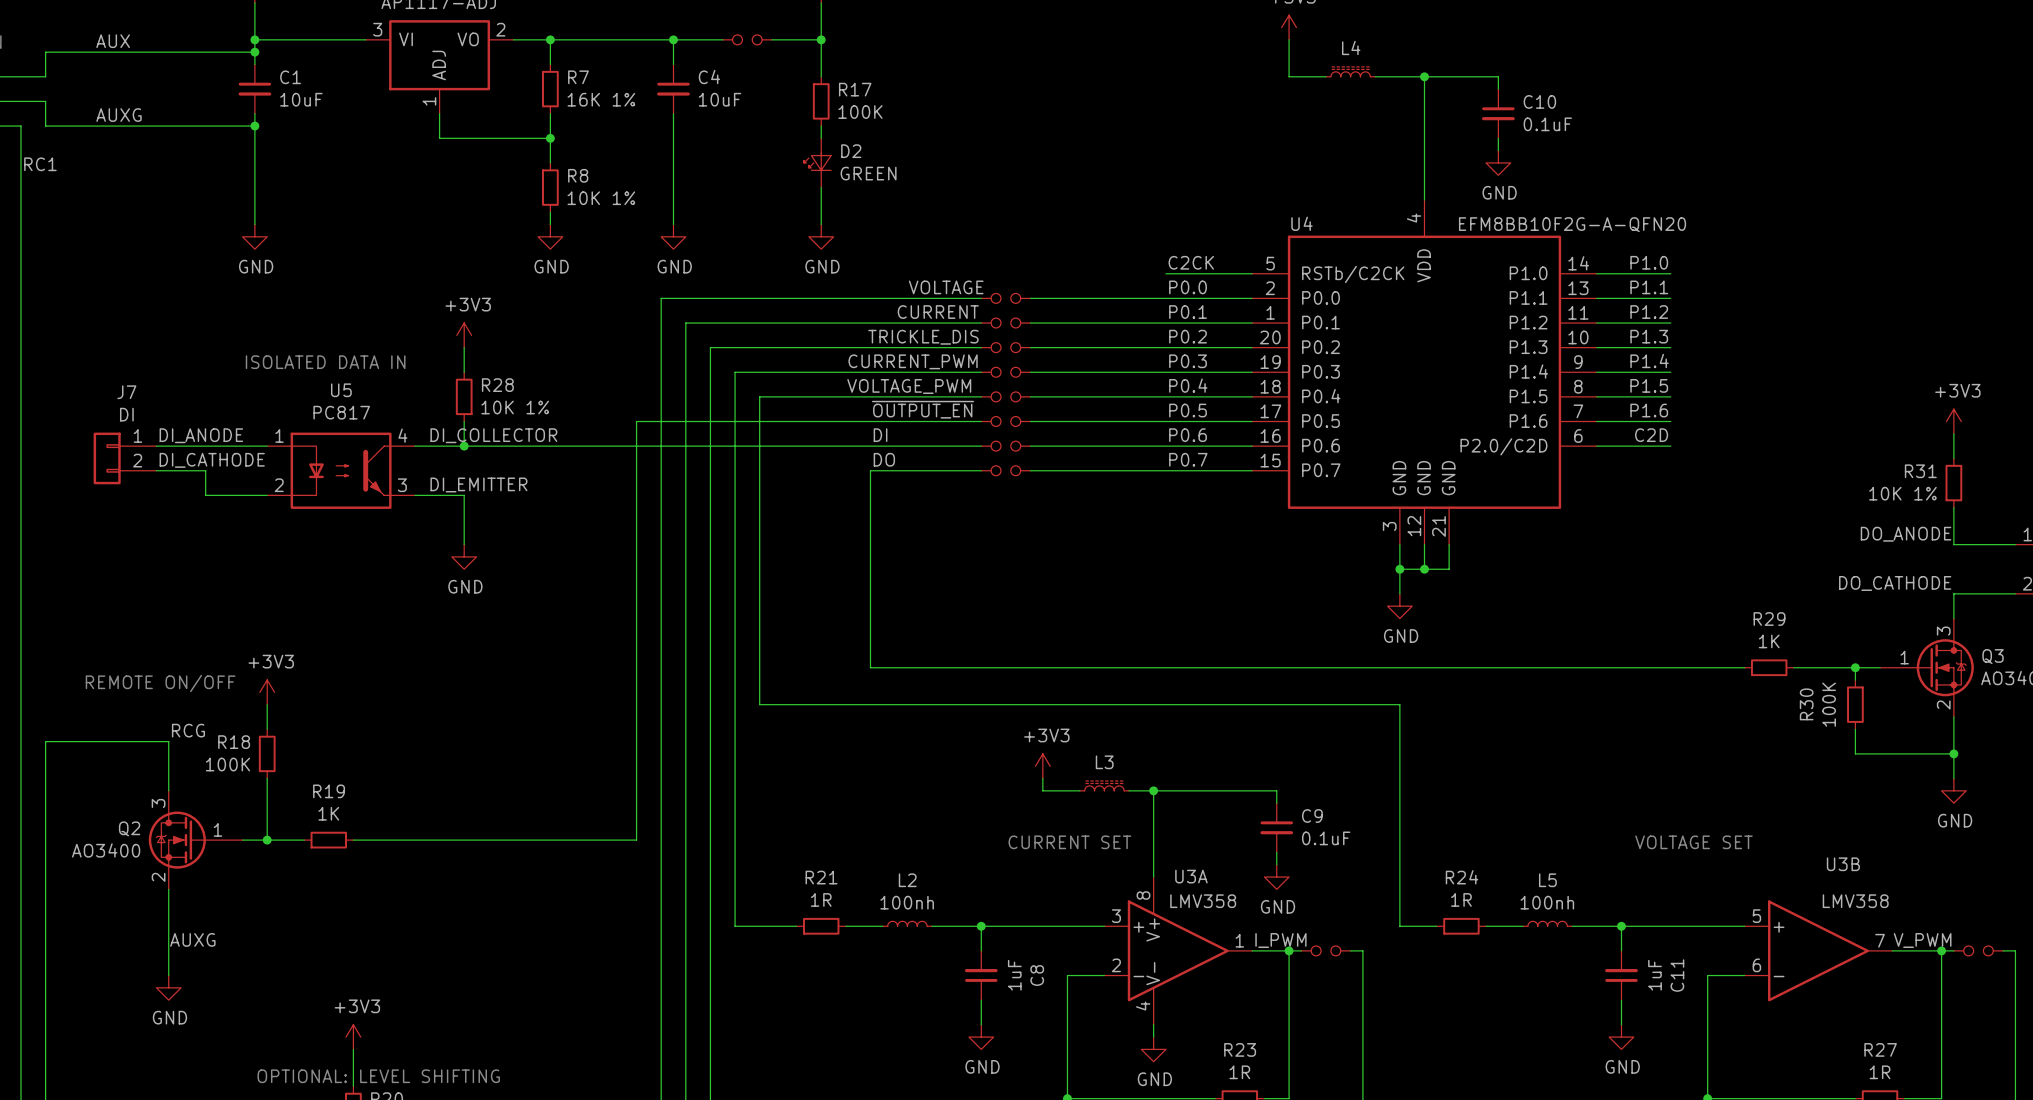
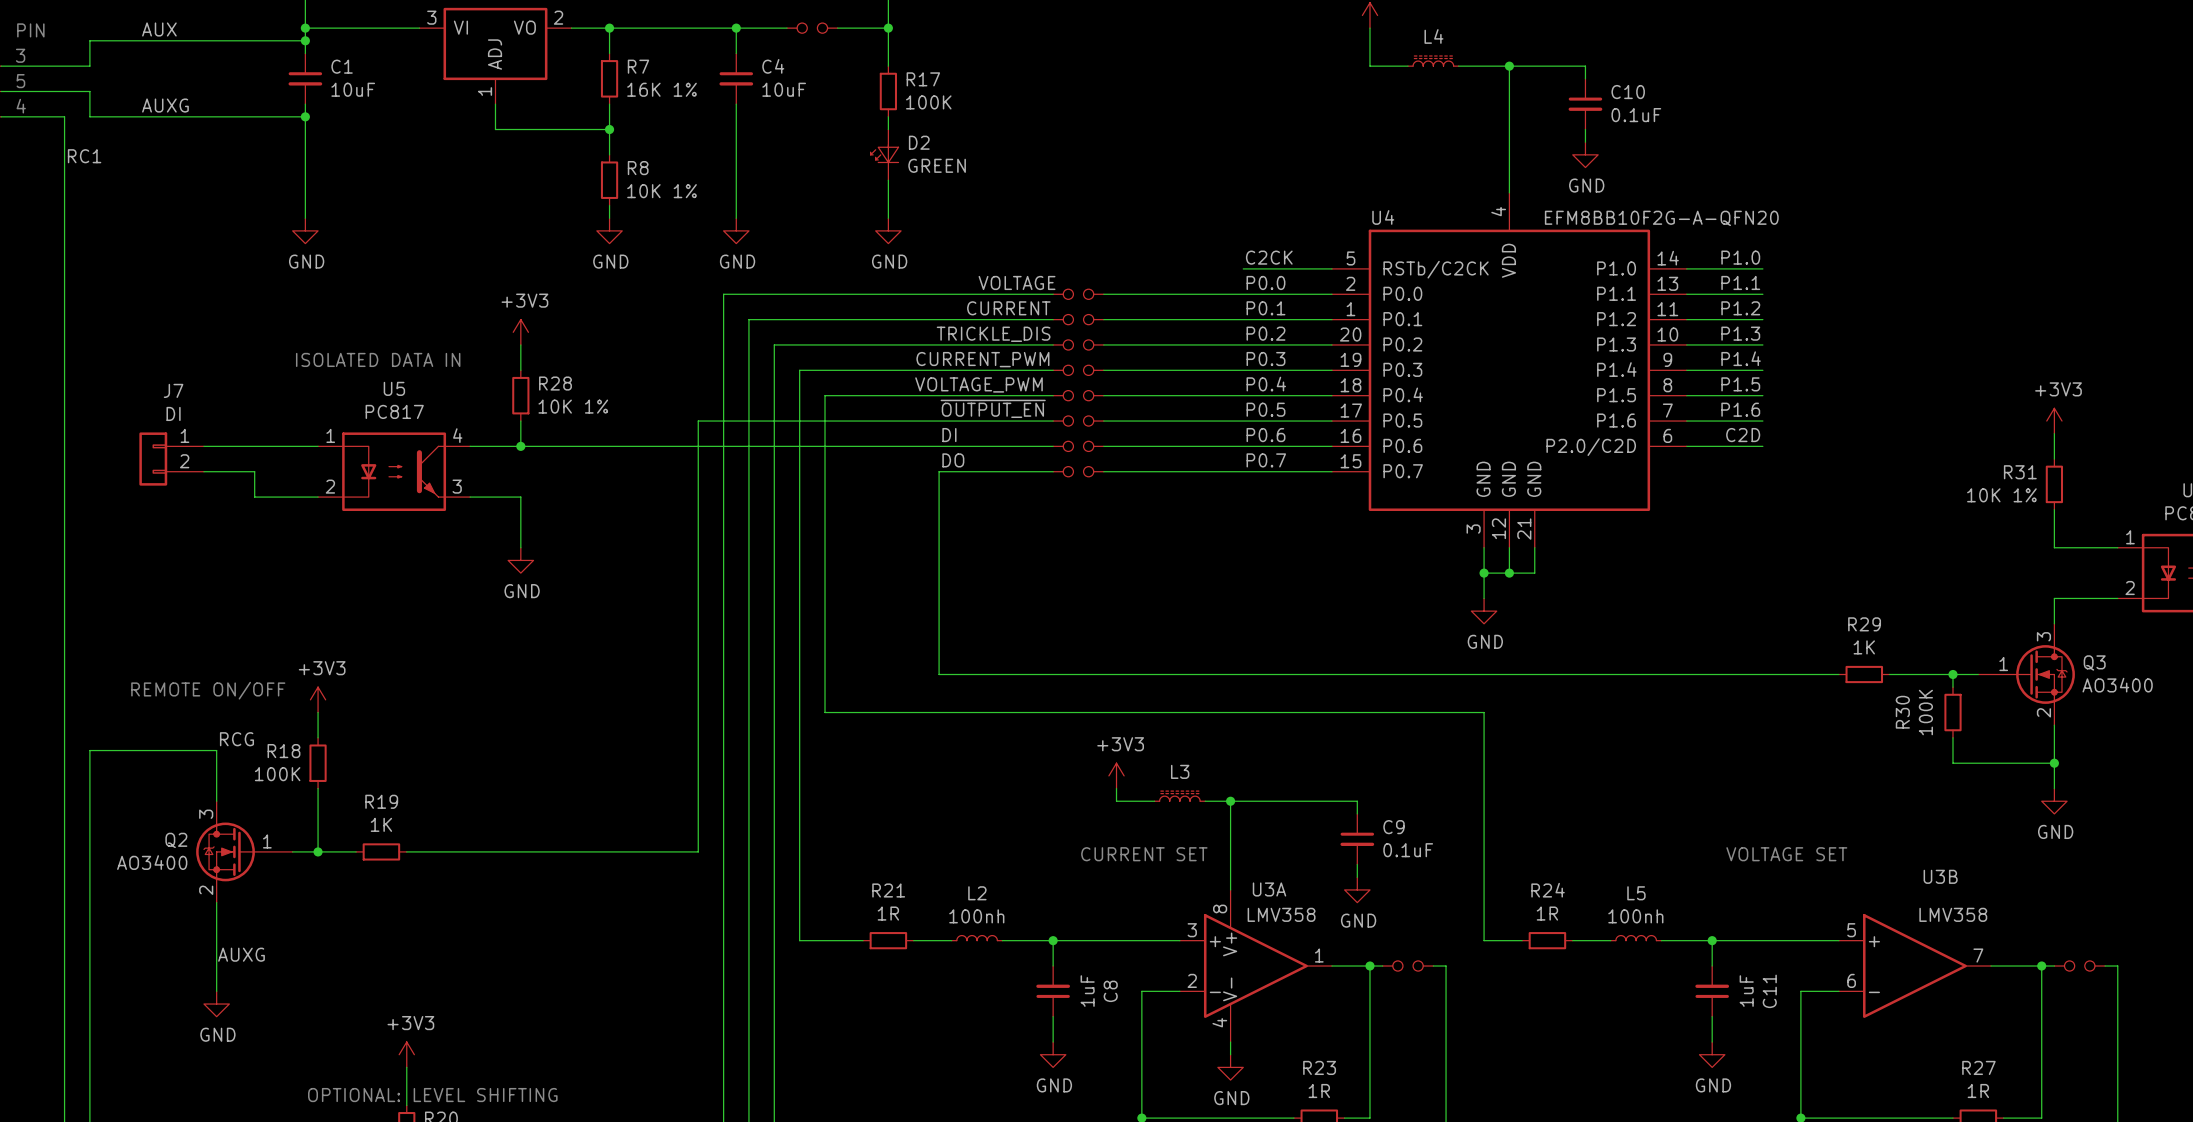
label: DI_ANODE (201, 435) -> none
label: DI_COLLECTOR (493, 435) -> none
label: DI_CATHODE (212, 460) -> none
label: DI_EMITTER (478, 484) -> none
label: DO_ANODE (1906, 534) -> none
label: DO_CATHODE (1895, 583) -> none
label: I_PWM (1280, 940) -> none
label: V_PWM (1922, 940) -> none

